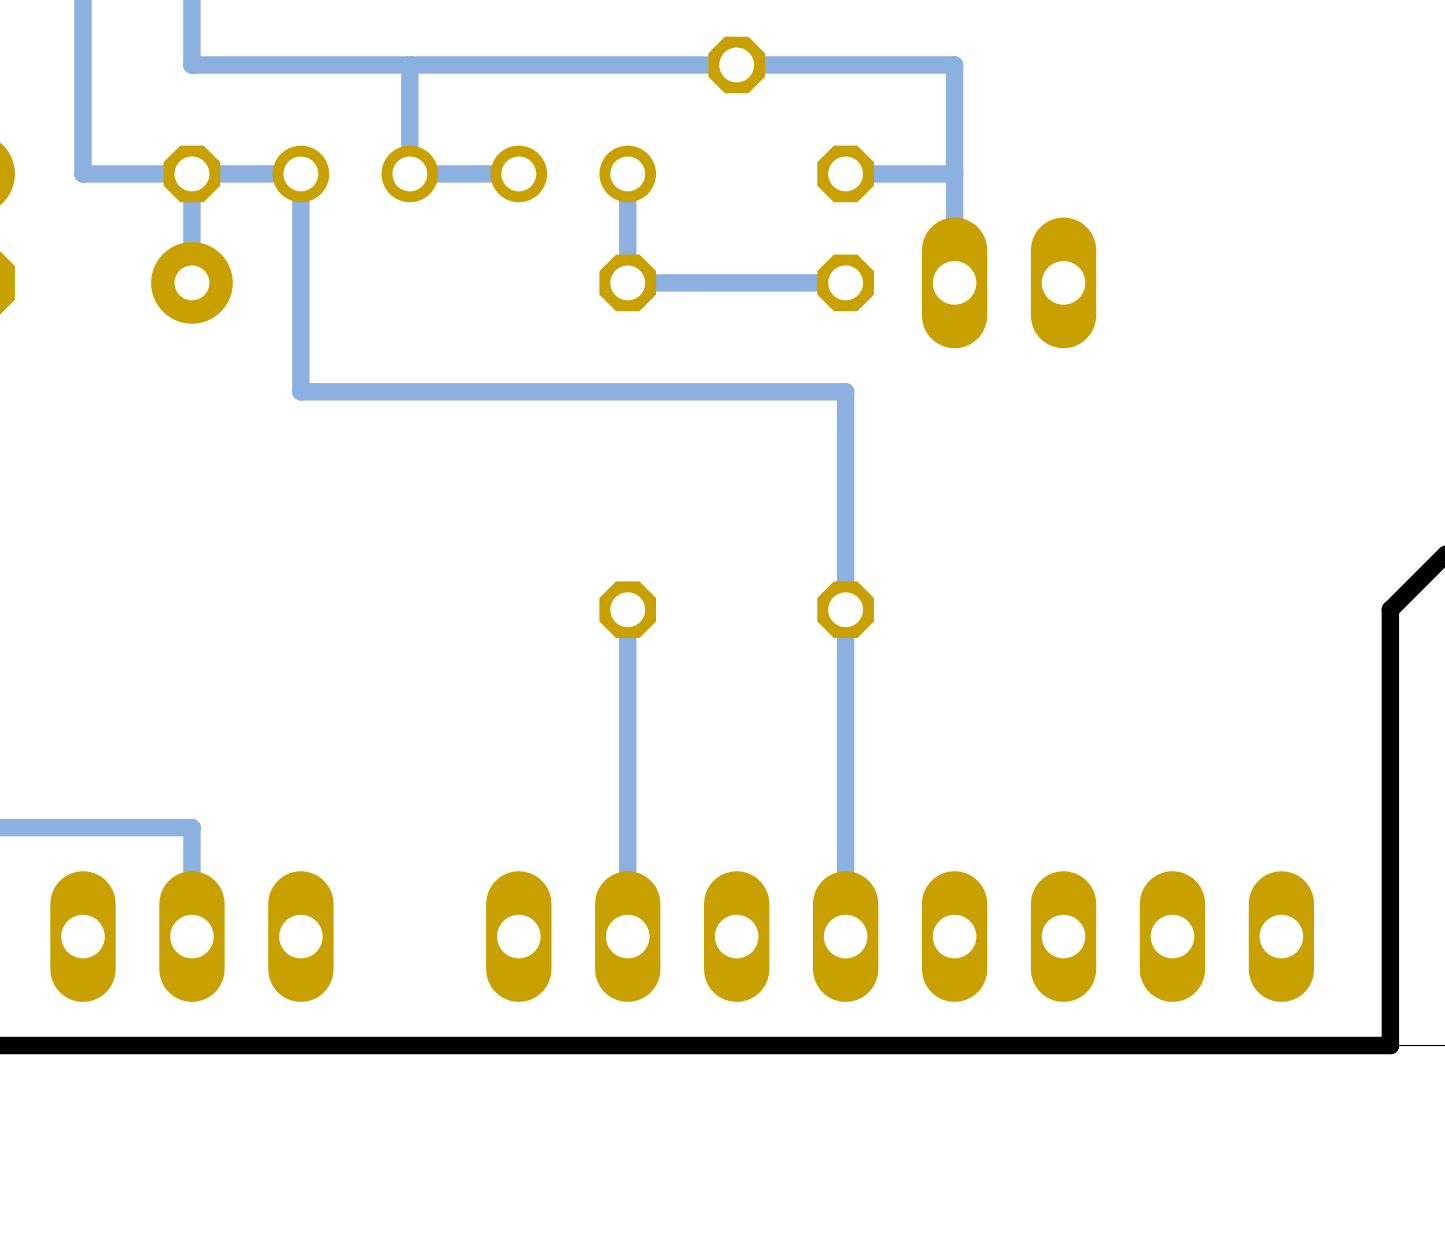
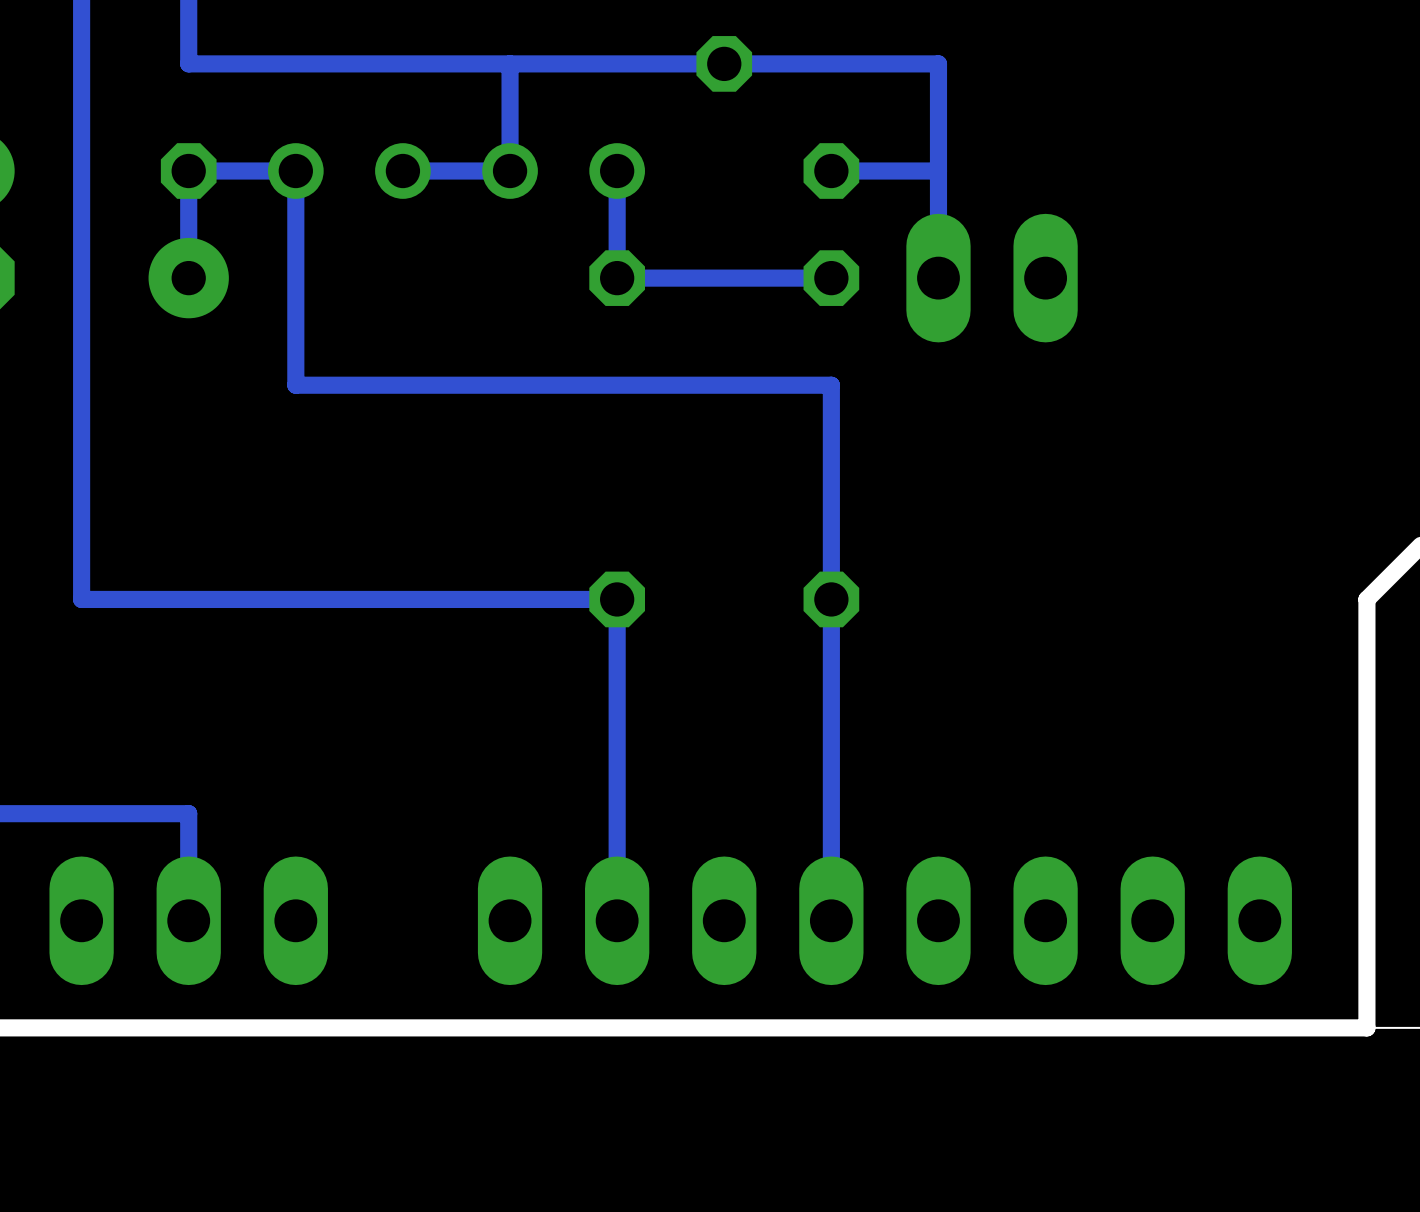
track: (409, 64) (409, 173) -> (510, 63) (510, 171)
track: (191, 173) (83, 173) -> (617, 599) (81, 599) (81, 171)

